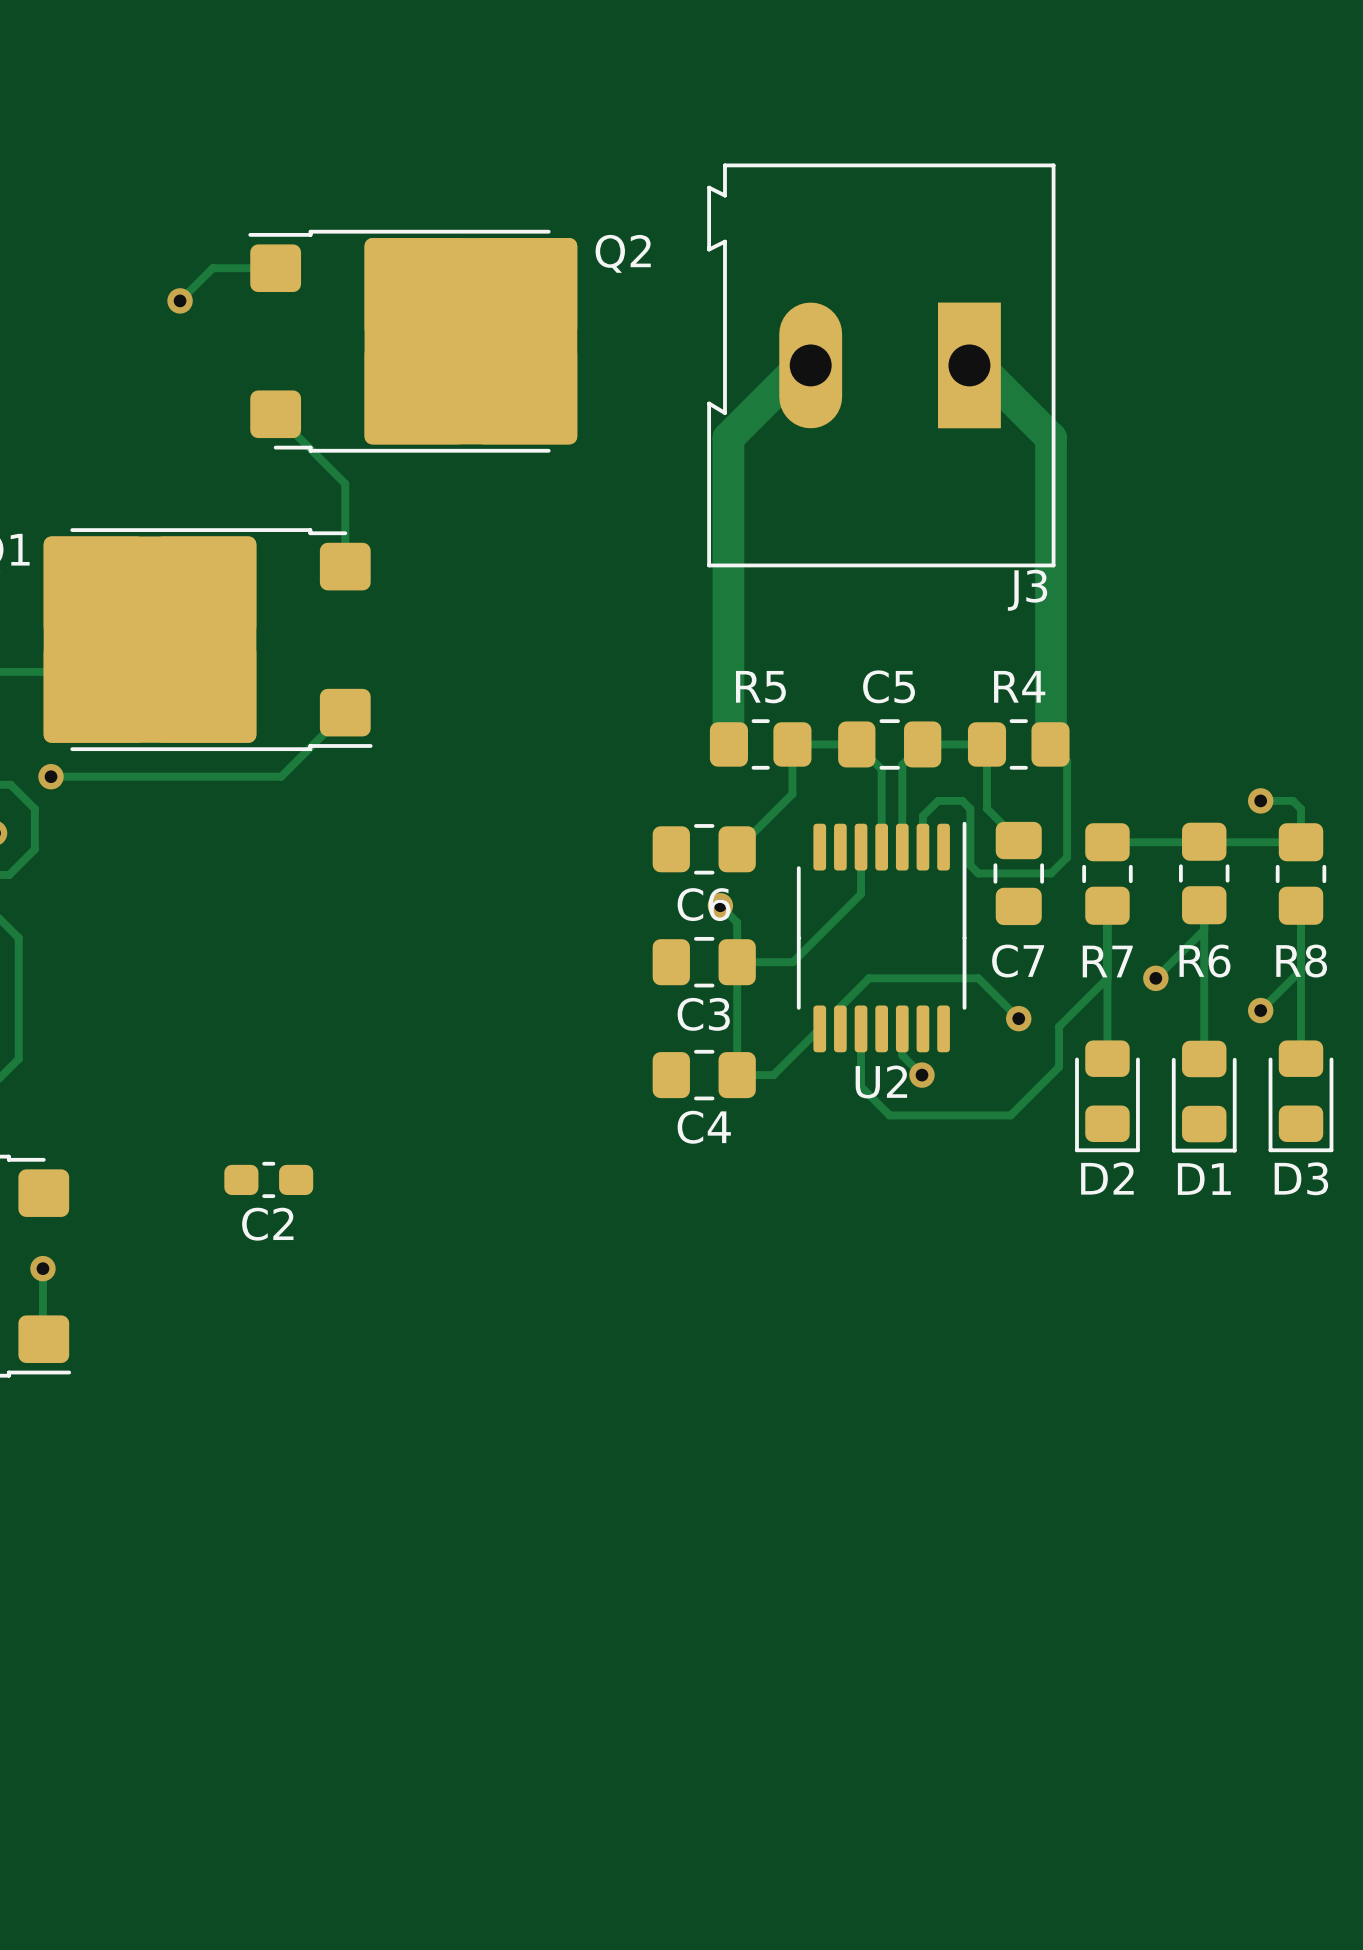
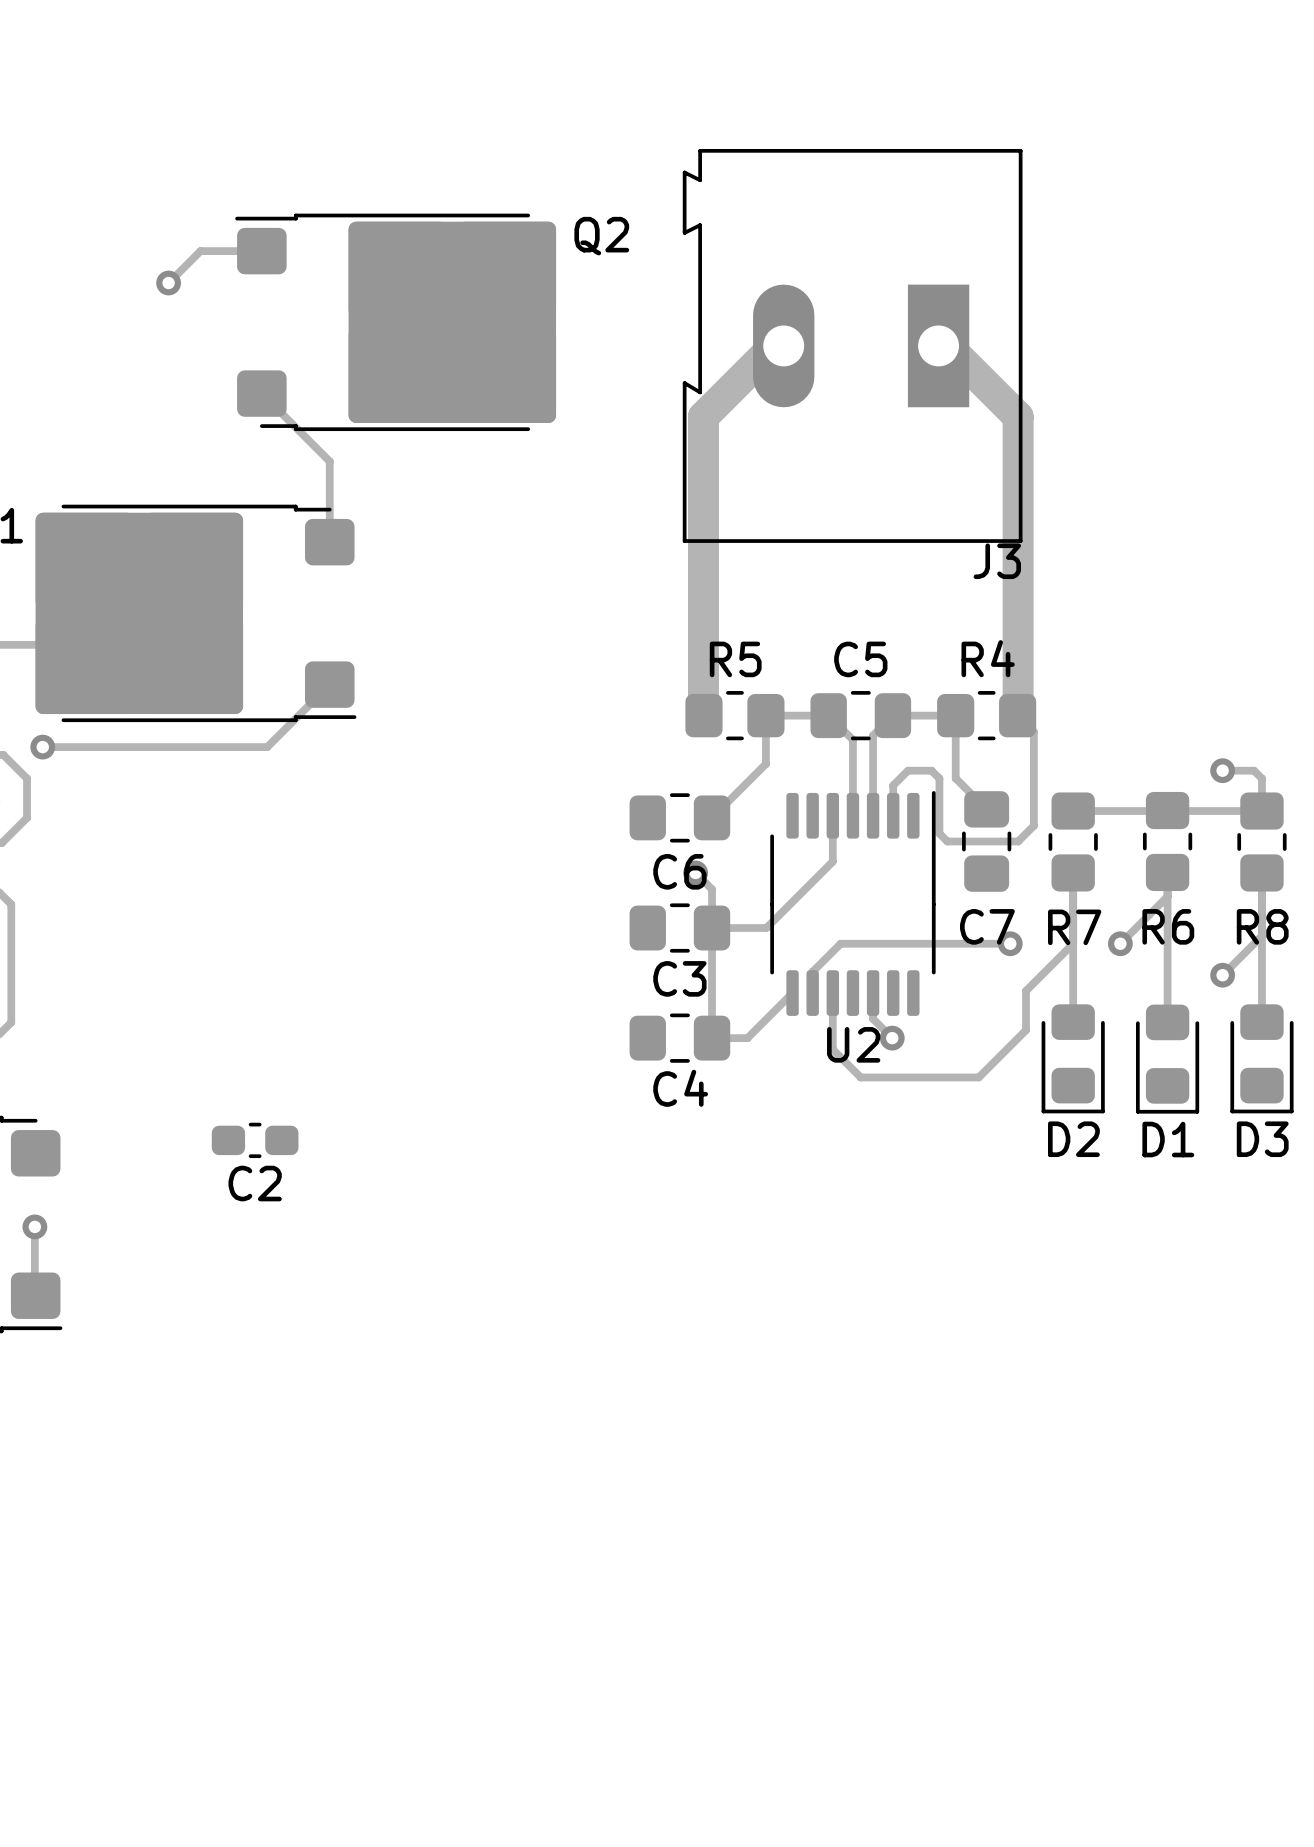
track: (978, 978) (1018, 1018) -> (947, 943) (1010, 943)
via position: (1018, 1018) -> (1010, 943)

